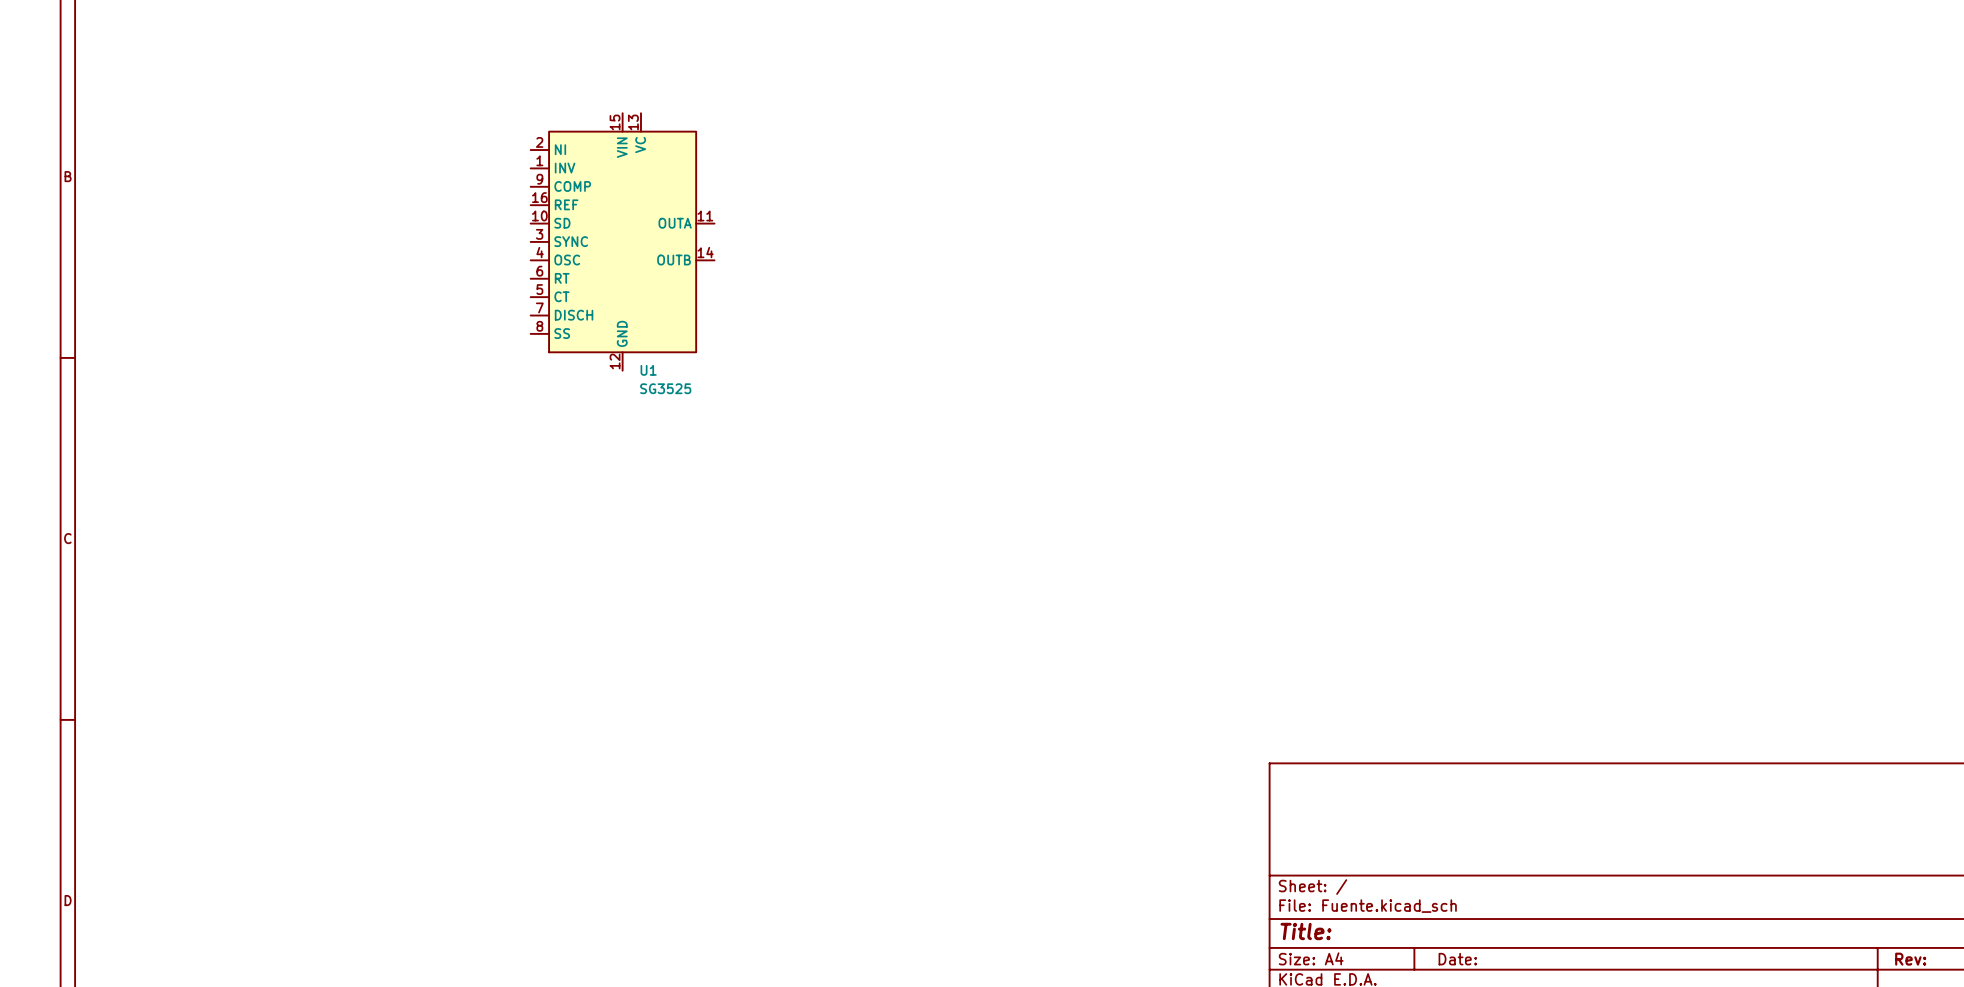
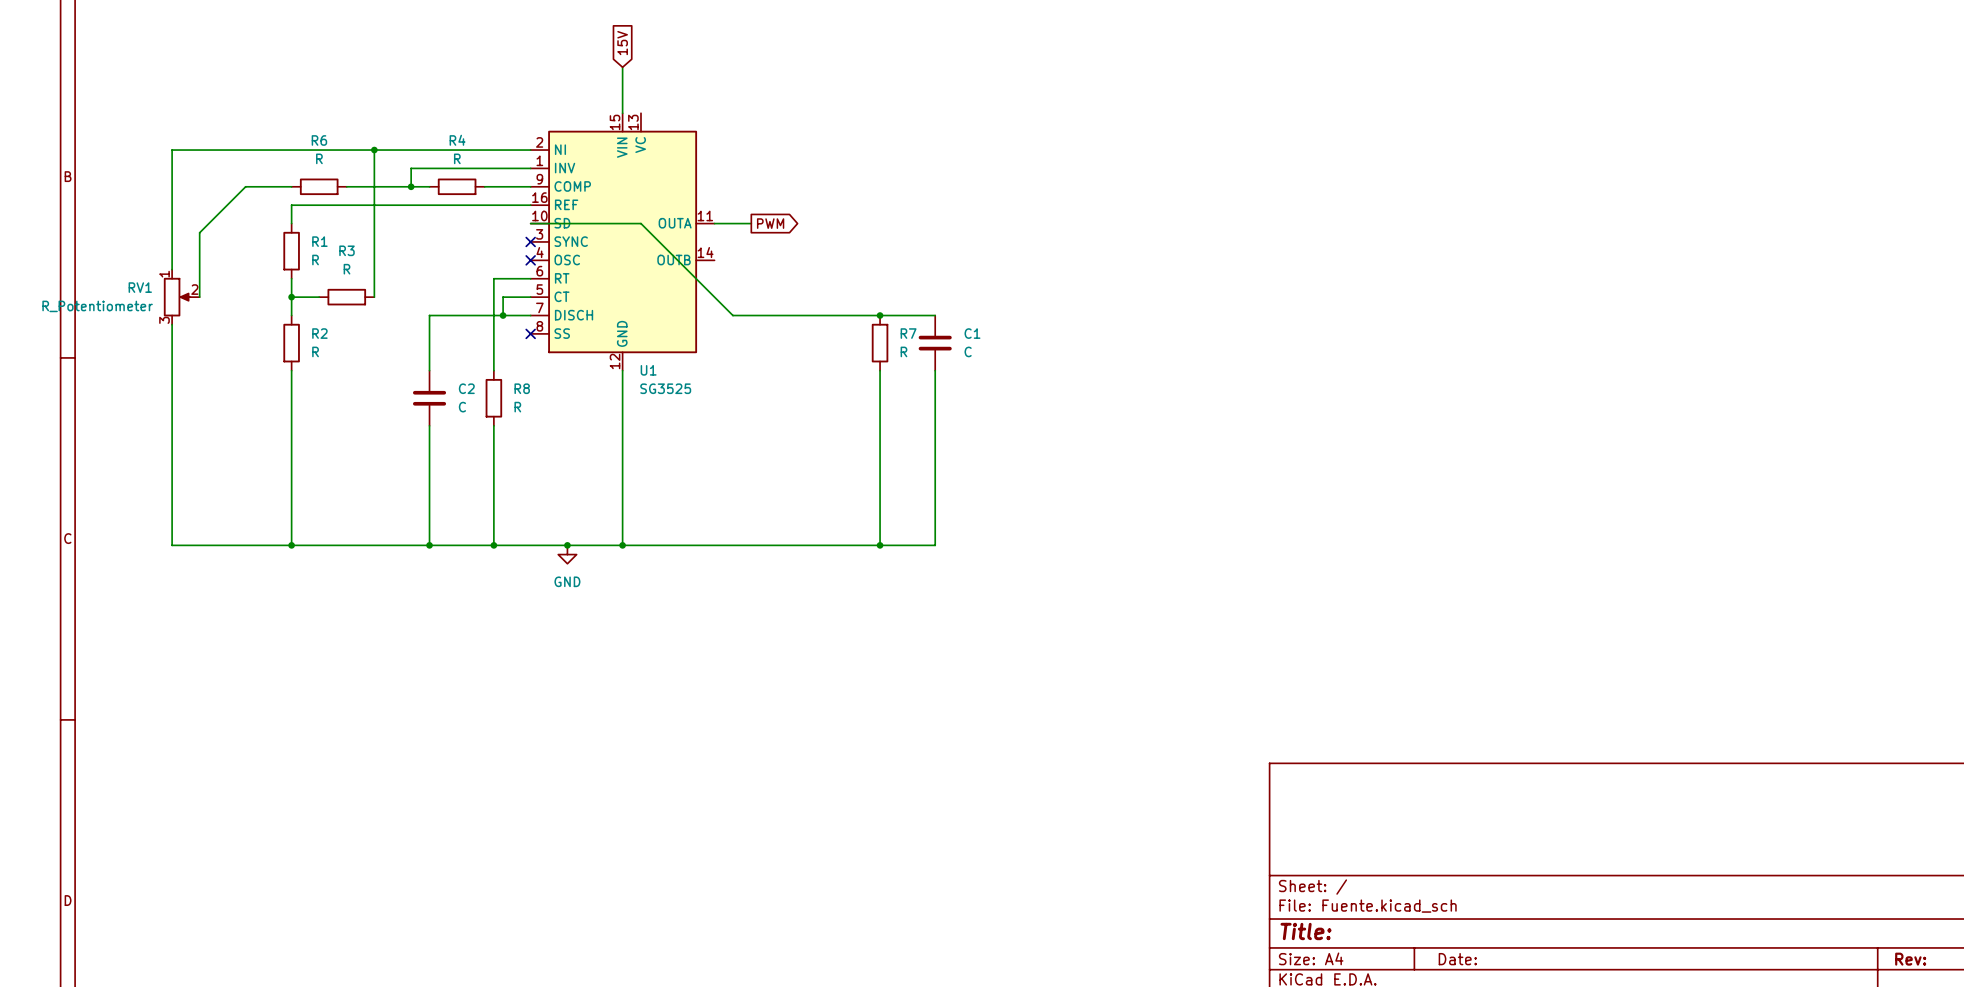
global label: none -> 15V (622, 43)
wire: none -> (622, 67) (622, 113)
wire: none -> (374, 150) (374, 297)
junction: none -> (374, 150)
wire: none -> (530, 150) (172, 150) (172, 269)
wire: none -> (530, 168) (411, 168) (411, 186)
wire: none -> (291, 186) (245, 186) (199, 232) (199, 297)
R6: none -> R (319, 186)
wire: none -> (346, 186) (429, 186)
junction: none -> (411, 186)
R4: none -> R (457, 186)
wire: none -> (484, 186) (530, 186)
wire: none -> (530, 205) (291, 205) (291, 223)
wire: none -> (530, 223) (640, 223) (732, 315) (935, 315)
wire: none -> (714, 223) (751, 223)
global label: none -> PWM (770, 223)
no-connect mark: none -> (530, 241)
R1: none -> R (291, 251)
no-connect mark: none -> (530, 260)
wire: none -> (291, 278) (291, 315)
wire: none -> (530, 278) (493, 278) (493, 370)
RV1: none -> R_Potentiometer (181, 297)
wire: none -> (291, 297) (319, 297)
junction: none -> (291, 297)
R3: none -> R (346, 297)
wire: none -> (530, 297) (503, 297) (503, 315)
junction: none -> (503, 315)
wire: none -> (530, 315) (429, 315) (429, 370)
junction: none -> (880, 315)
wire: none -> (172, 324) (172, 545) (935, 545) (935, 370)
no-connect mark: none -> (530, 333)
R2: none -> R (291, 343)
R7: none -> R (880, 343)
C1: none -> C (935, 343)
wire: none -> (291, 370) (291, 545)
wire: none -> (622, 370) (622, 545)
wire: none -> (880, 370) (880, 545)
C2: none -> C (429, 398)
R8: none -> R (493, 398)
wire: none -> (429, 425) (429, 545)
wire: none -> (493, 425) (493, 545)
junction: none -> (291, 545)
junction: none -> (429, 545)
junction: none -> (493, 545)
junction: none -> (567, 545)
junction: none -> (622, 545)
junction: none -> (880, 545)
power symbol: none -> GND (567, 554)

